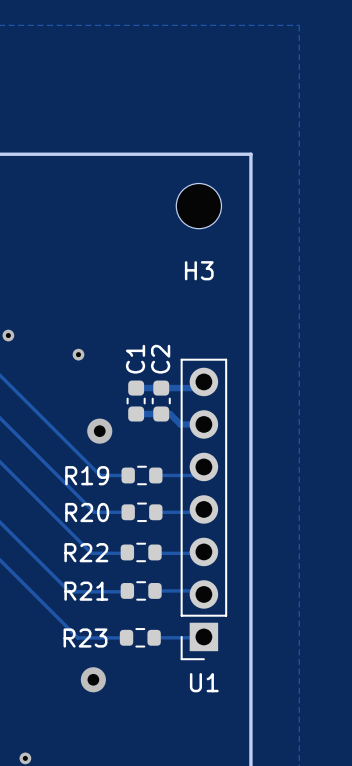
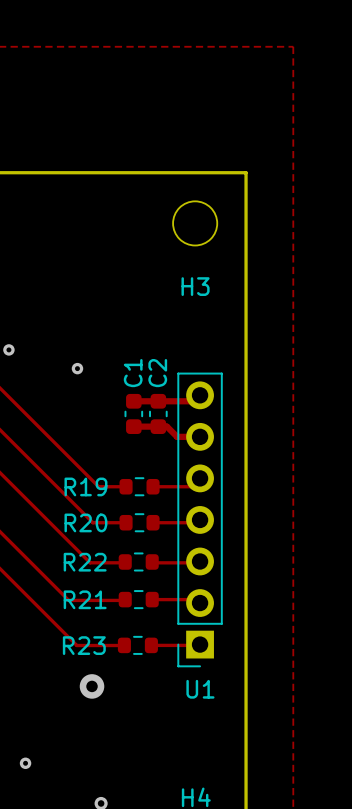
via: (99, 431) -> none

